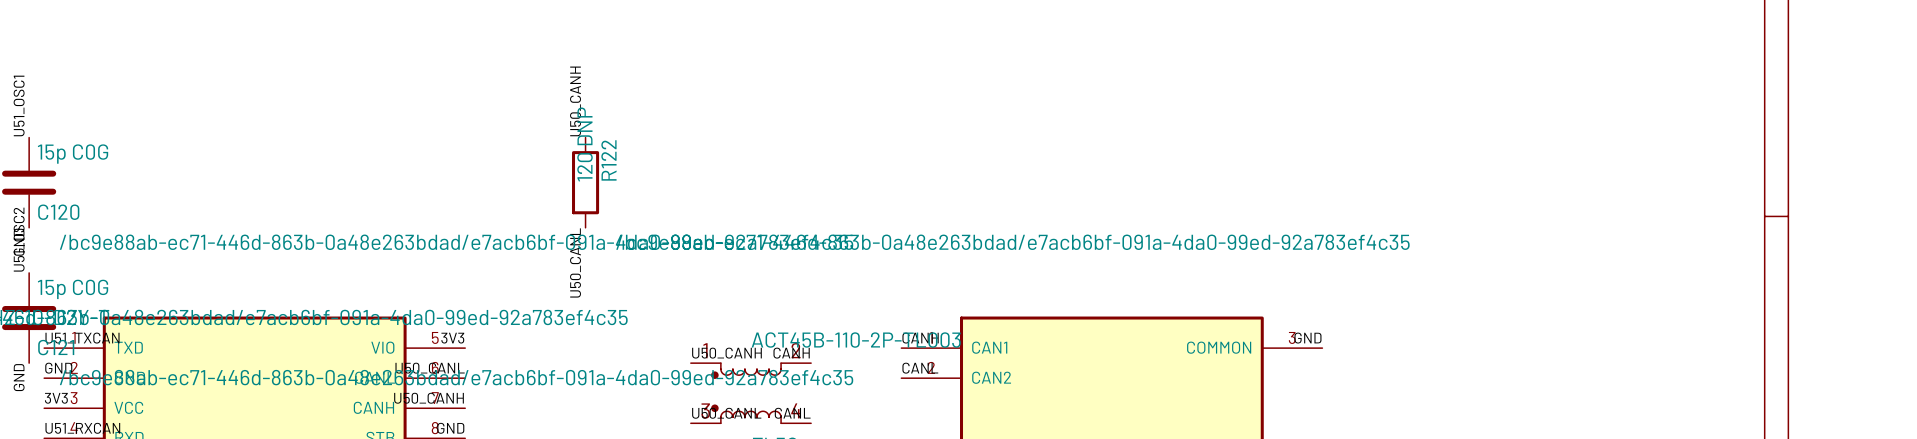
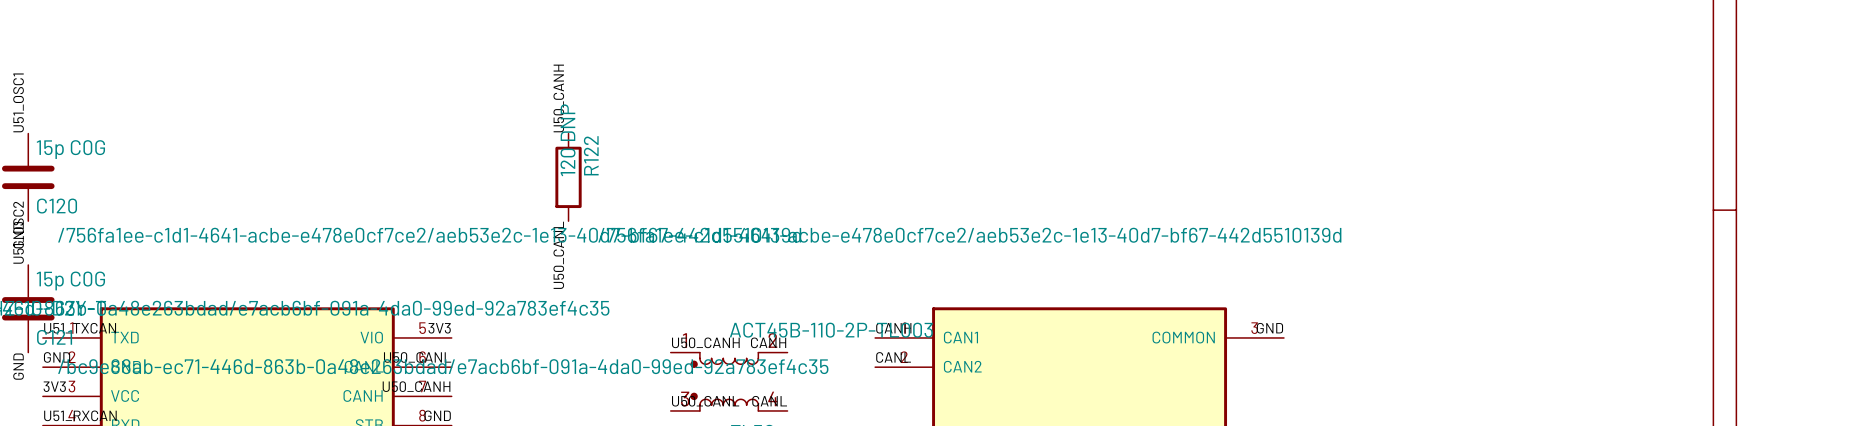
C120 text: /bc9e88ab-ec71-446d-863b-0a48e263bdad/e7acb6bf-091a-4da0-99ed-92a783ef4c35 (456, 242) -> /756fa1ee-c1d1-4641-acbe-e478e0cf7ce2/aeb53e2c-1e13-40d7-bf67-442d5510139d (429, 235)
R122 text: /bc9e88ab-ec71-446d-863b-0a48e263bdad/e7acb6bf-091a-4da0-99ed-92a783ef4c35 (1012, 242) -> /756fa1ee-c1d1-4641-acbe-e478e0cf7ce2/aeb53e2c-1e13-40d7-bf67-442d5510139d (969, 235)

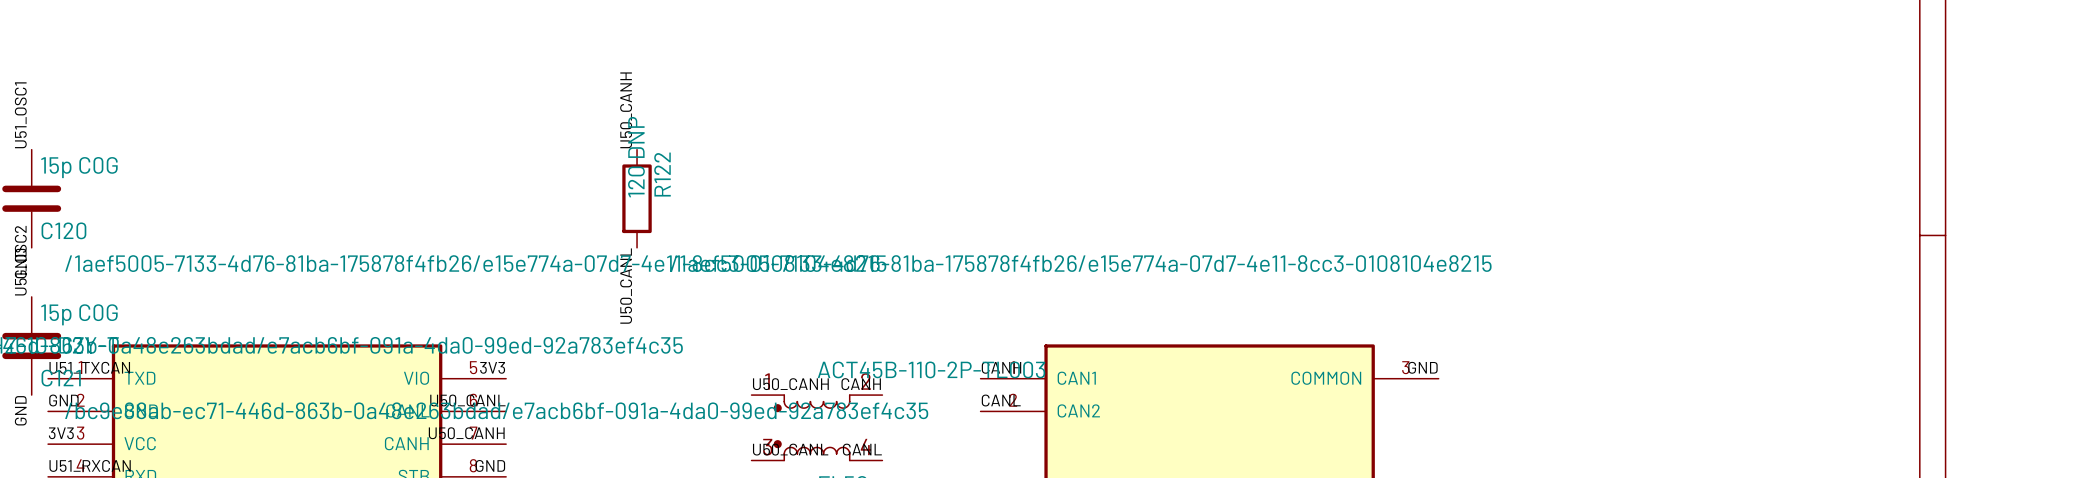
C120 text: /756fa1ee-c1d1-4641-acbe-e478e0cf7ce2/aeb53e2c-1e13-40d7-bf67-442d5510139d (429, 235) -> /1aef5005-7133-4d76-81ba-175878f4fb26/e15e774a-07d7-4e11-8cc3-0108104e8215 (475, 263)
R122 text: /756fa1ee-c1d1-4641-acbe-e478e0cf7ce2/aeb53e2c-1e13-40d7-bf67-442d5510139d (969, 235) -> /1aef5005-7133-4d76-81ba-175878f4fb26/e15e774a-07d7-4e11-8cc3-0108104e8215 (1081, 263)

